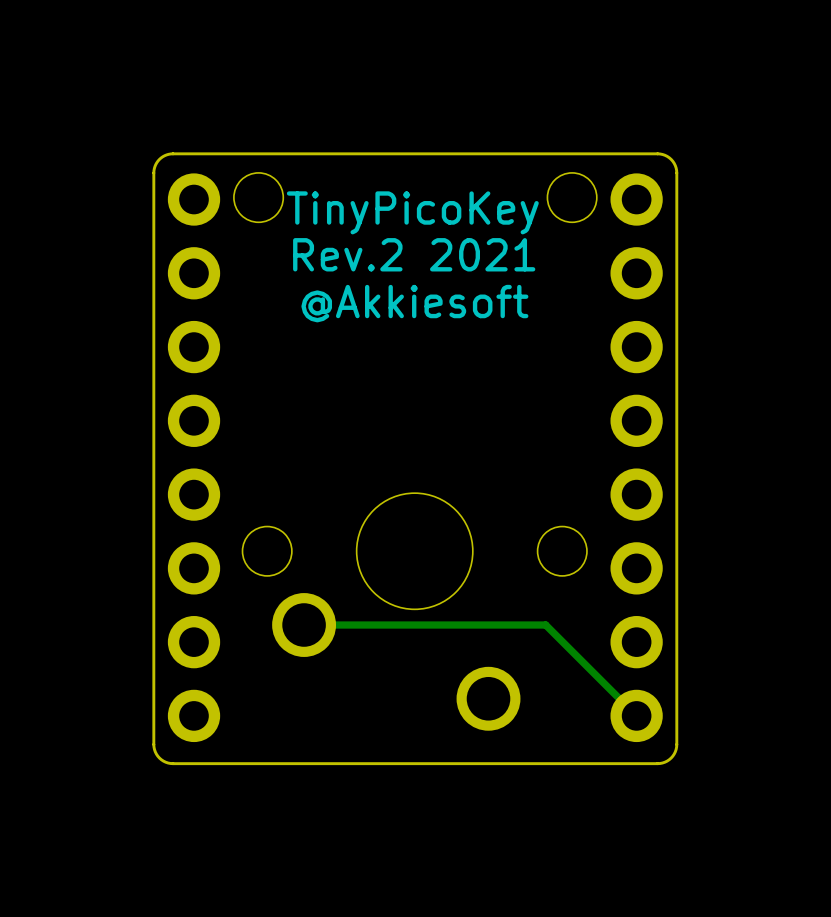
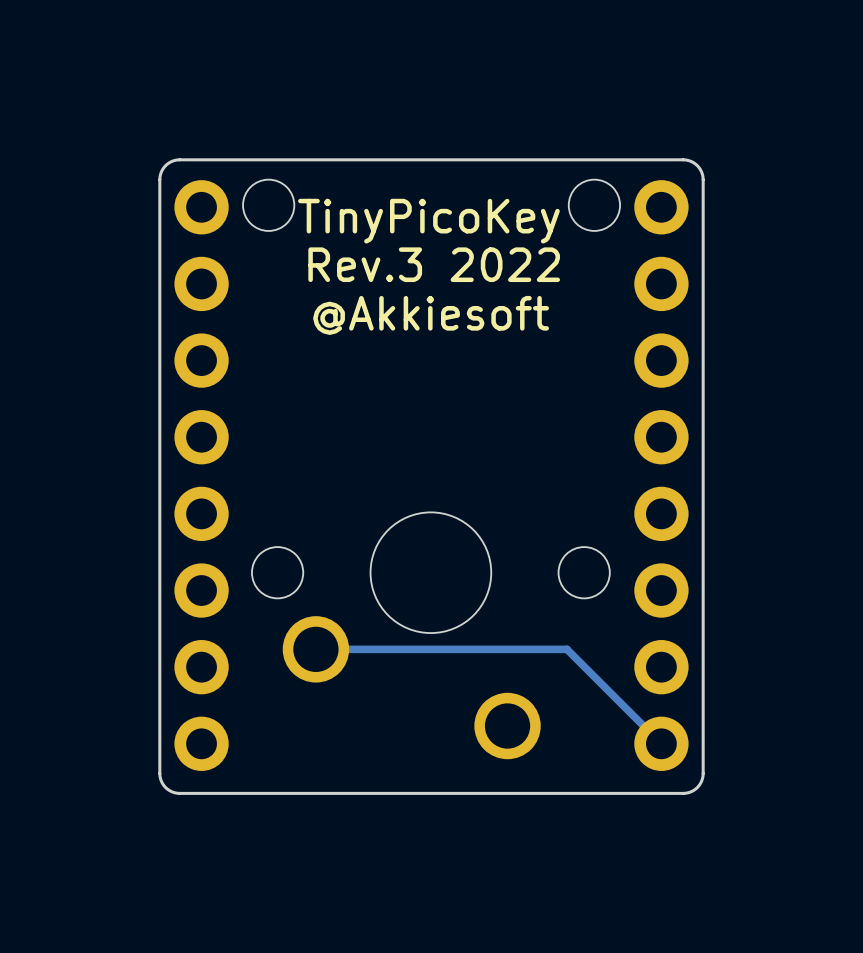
text: Rev.2 2021 (414, 254) -> Rev.3 2022 (434, 264)

